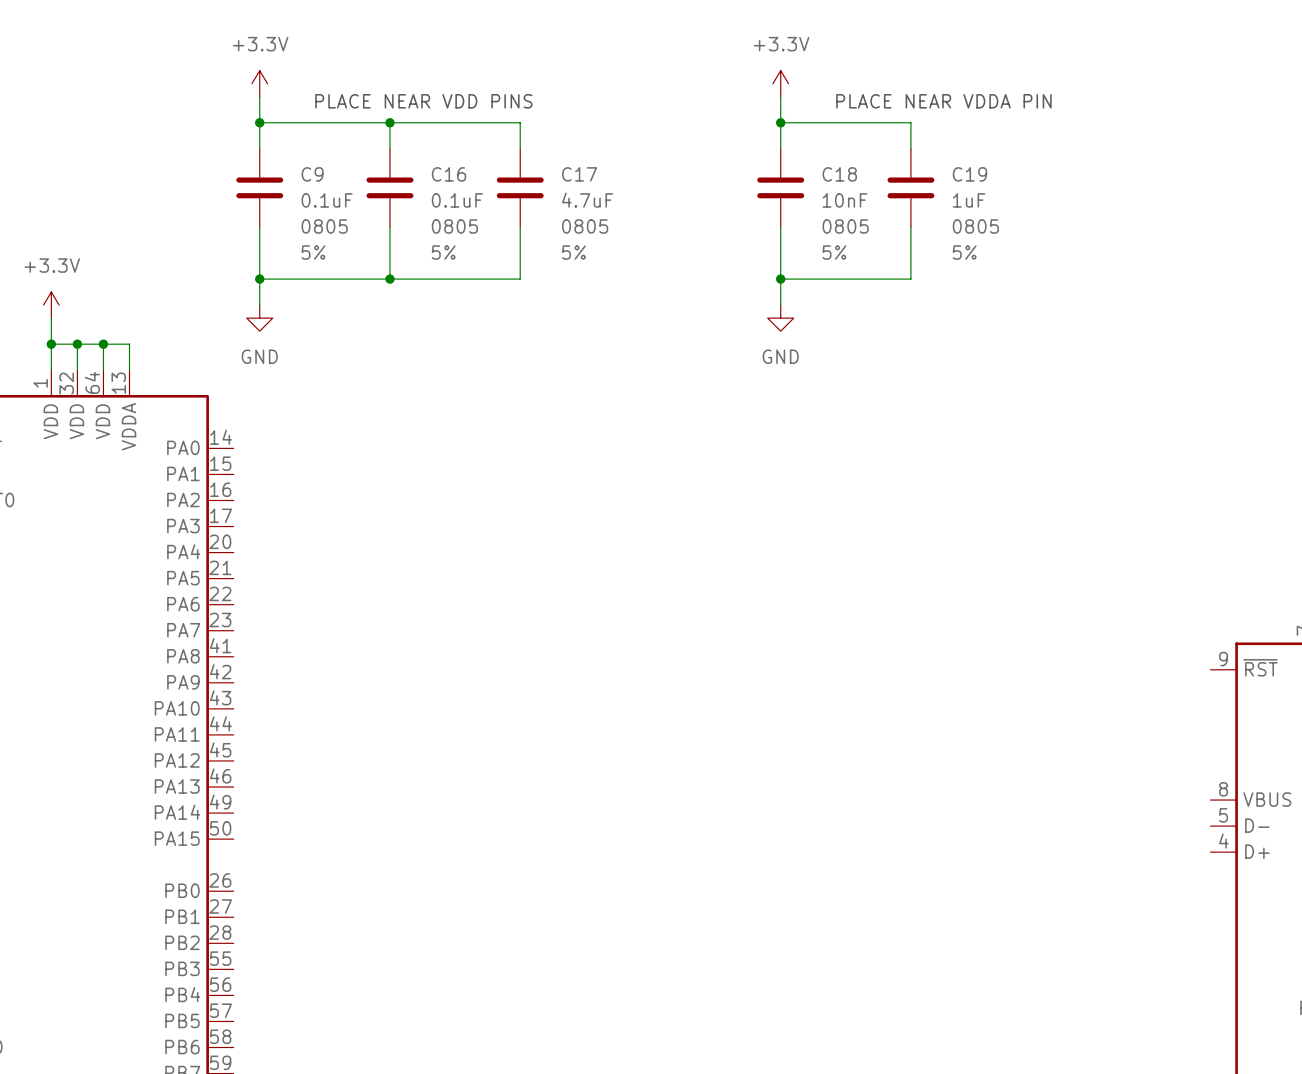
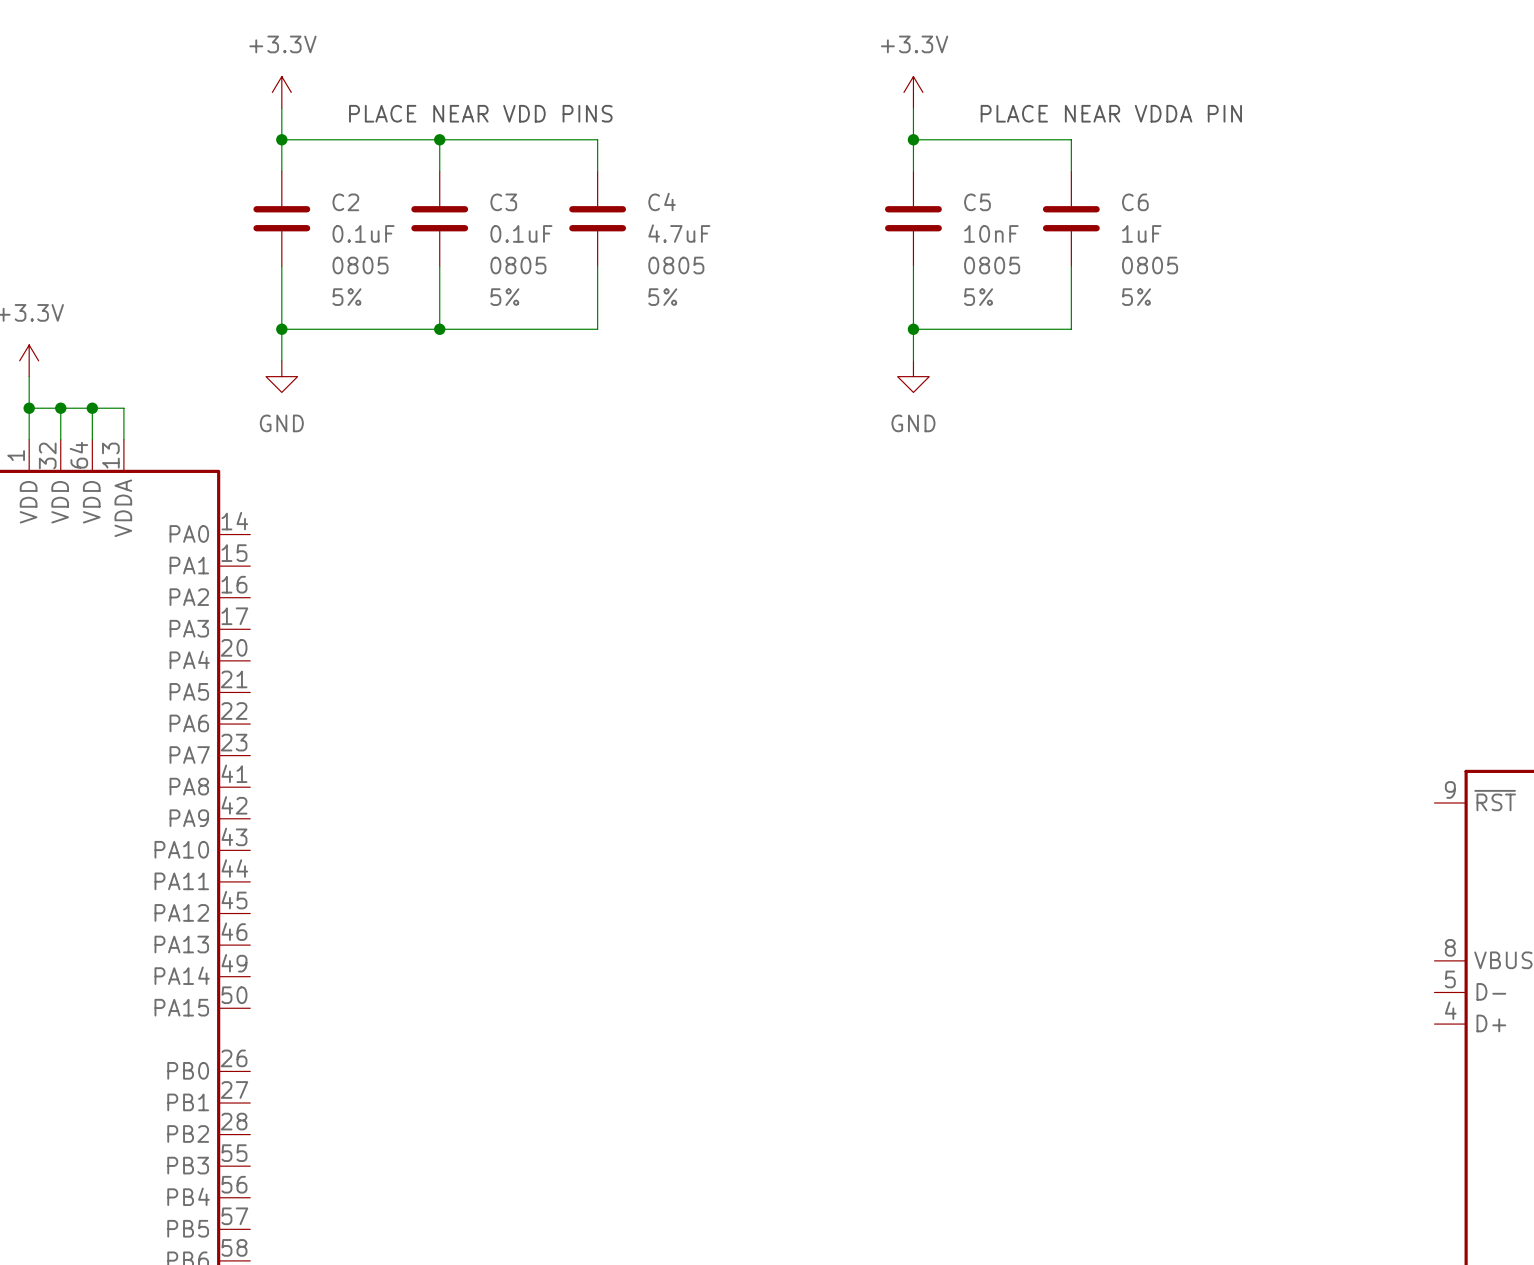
C9 name: C9 (312, 174) -> C2 (345, 202)
C16 name: C16 (449, 174) -> C3 (503, 202)
C17 name: C17 (579, 174) -> C4 (662, 201)
C18 name: C18 (839, 174) -> C5 (977, 202)
C19 name: C19 (969, 174) -> C6 (1135, 202)

